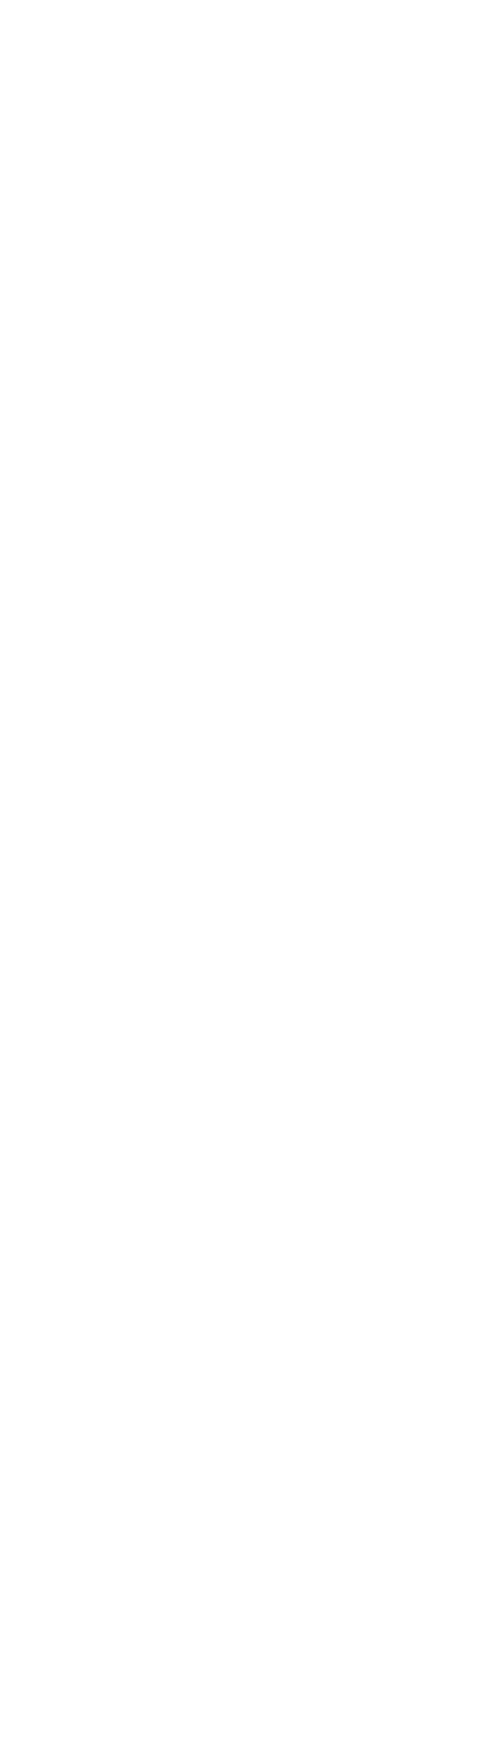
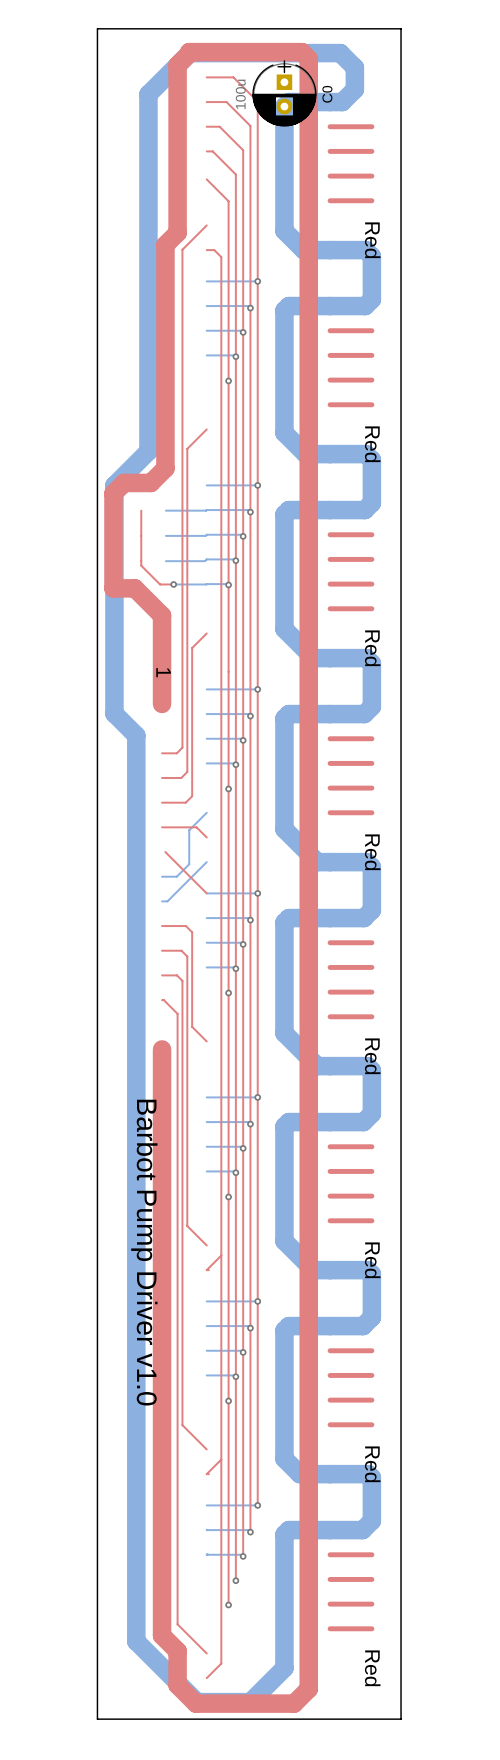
board edge: none -> (97, 28) (401, 28) (401, 1719) (97, 1719) (97, 28)
bottom track: none -> (189, 53) (340, 53) (354, 67) (354, 89) (342, 102) (288, 102) (284, 106) (284, 230) (303, 250) (365, 250) (371, 256) (371, 299) (365, 306) (288, 306) (284, 310) (284, 432) (305, 454) (366, 454) (371, 459) (371, 503) (364, 510) (288, 510) (284, 514) (284, 629) (313, 658) (366, 658) (371, 663) (371, 706) (364, 714) (288, 714) (284, 718) (284, 829) (317, 862) (366, 862) (371, 867) (371, 910) (364, 918) (288, 918) (284, 922) (284, 1033) (317, 1066) (367, 1066) (371, 1070) (371, 1113) (363, 1122) (288, 1122) (284, 1126) (284, 1241) (313, 1270) (367, 1270) (371, 1274) (371, 1317) (363, 1326) (288, 1326) (284, 1330) (284, 1458) (299, 1474) (368, 1474) (371, 1477) (371, 1520) (362, 1530) (288, 1530) (284, 1534) (284, 1668) (250, 1702) (197, 1702) (136, 1641) (136, 735) (114, 713) (114, 485) (148, 451) (148, 94) (189, 53)
top track: none -> (206, 77) (233, 77) (257, 101) (257, 1505)
C0: none -> 100u (284, 93)
top track: none -> (206, 102) (226, 102) (250, 125) (250, 1532)
top track: none -> (206, 126) (219, 126) (243, 150) (243, 1556)
top track: none -> (330, 126) (371, 126)
top track: none -> (206, 151) (212, 151) (235, 174) (235, 1580)
top track: none -> (330, 151) (371, 151)
top track: none -> (330, 176) (371, 176)
top track: none -> (206, 179) (228, 201) (228, 1605)
top track: none -> (330, 200) (371, 200)
top track: none -> (206, 225) (182, 249) (182, 747) (176, 753) (162, 753)
text: none -> Red (372, 240)
top track: none -> (206, 250) (214, 250) (221, 257) (221, 1663) (206, 1678)
bottom track: none -> (206, 281) (257, 281)
via: none -> (257, 281)
bottom track: none -> (206, 306) (248, 306) (250, 308)
via: none -> (250, 308)
bottom track: none -> (206, 330) (241, 330) (243, 332)
top track: none -> (330, 330) (371, 330)
via: none -> (243, 332)
bottom track: none -> (206, 355) (235, 356)
top track: none -> (330, 355) (371, 355)
via: none -> (235, 356)
via: none -> (228, 380)
top track: none -> (330, 380) (371, 380)
top track: none -> (330, 404) (371, 404)
top track: none -> (206, 429) (187, 448) (187, 771) (181, 778) (162, 778)
text: none -> Red (372, 444)
bottom track: none -> (206, 485) (257, 485)
via: none -> (257, 485)
top track: none -> (141, 510) (141, 565) (160, 584) (173, 584)
bottom track: none -> (165, 510) (248, 510) (250, 512)
via: none -> (250, 512)
top track: none -> (330, 534) (371, 534)
bottom track: none -> (165, 535) (241, 534) (243, 536)
via: none -> (243, 536)
top track: none -> (330, 559) (371, 559)
bottom track: none -> (235, 560) (165, 561)
via: none -> (235, 560)
bottom track: none -> (173, 584) (228, 584)
via: none -> (173, 584)
via: none -> (228, 584)
top track: none -> (330, 584) (371, 584)
top track: none -> (330, 608) (371, 608)
top track: none -> (206, 633) (192, 648) (192, 796) (185, 802) (162, 802)
text: none -> Red (372, 648)
text: none -> 1 (163, 672)
bottom track: none -> (206, 689) (257, 689)
via: none -> (257, 689)
top track: none -> (162, 703) (162, 615) (134, 588) (113, 588) (113, 493) (124, 482) (150, 482) (165, 468) (165, 244) (177, 232) (177, 65) (189, 52) (301, 52) (308, 58) (308, 1689) (294, 1703) (196, 1703) (177, 1685) (177, 1651) (162, 1635) (162, 1049)
bottom track: none -> (206, 714) (248, 714) (250, 716)
via: none -> (250, 716)
bottom track: none -> (206, 738) (241, 738) (243, 740)
top track: none -> (330, 738) (371, 738)
via: none -> (243, 740)
bottom track: none -> (206, 763) (235, 764)
top track: none -> (330, 763) (371, 763)
via: none -> (235, 764)
via: none -> (228, 788)
top track: none -> (330, 788) (371, 788)
bottom track: none -> (206, 812) (189, 830) (189, 864) (176, 876) (162, 876)
top track: none -> (330, 812) (371, 812)
top track: none -> (162, 827) (196, 827) (206, 837)
top track: none -> (165, 852) (206, 893)
text: none -> Red (372, 852)
bottom track: none -> (206, 862) (167, 901) (162, 901)
bottom track: none -> (206, 893) (257, 893)
via: none -> (257, 893)
bottom track: none -> (206, 918) (248, 918) (250, 920)
via: none -> (250, 920)
top track: none -> (162, 926) (185, 926) (192, 932) (192, 1026) (206, 1041)
bottom track: none -> (206, 942) (241, 942) (243, 944)
top track: none -> (330, 942) (371, 942)
via: none -> (243, 944)
top track: none -> (162, 950) (181, 950) (187, 956) (187, 1226) (206, 1245)
bottom track: none -> (206, 967) (235, 968)
top track: none -> (330, 967) (371, 967)
via: none -> (235, 968)
top track: none -> (162, 975) (177, 975) (182, 980) (182, 1425) (206, 1449)
via: none -> (228, 992)
top track: none -> (330, 992) (371, 992)
top track: none -> (162, 1000) (177, 1013) (177, 1624) (206, 1653)
top track: none -> (330, 1016) (371, 1016)
text: none -> Red (372, 1056)
bottom track: none -> (206, 1097) (257, 1097)
via: none -> (257, 1097)
bottom track: none -> (206, 1122) (248, 1122) (250, 1124)
via: none -> (250, 1124)
bottom track: none -> (206, 1146) (241, 1146) (243, 1148)
top track: none -> (330, 1146) (371, 1146)
via: none -> (243, 1148)
bottom track: none -> (206, 1171) (235, 1172)
top track: none -> (330, 1171) (371, 1171)
via: none -> (235, 1172)
via: none -> (228, 1196)
top track: none -> (330, 1196) (371, 1196)
top track: none -> (330, 1220) (371, 1220)
text: none -> Barbot Pump Driver v1.0 (144, 1252)
top track: none -> (221, 1255) (206, 1270) (208, 1270)
text: none -> Red (372, 1260)
bottom track: none -> (206, 1301) (257, 1301)
via: none -> (257, 1301)
bottom track: none -> (206, 1326) (248, 1326) (250, 1328)
via: none -> (250, 1328)
bottom track: none -> (206, 1350) (241, 1350) (243, 1352)
top track: none -> (330, 1350) (371, 1350)
via: none -> (243, 1352)
bottom track: none -> (206, 1375) (235, 1376)
top track: none -> (330, 1375) (371, 1375)
via: none -> (235, 1376)
via: none -> (228, 1400)
top track: none -> (330, 1400) (371, 1400)
top track: none -> (330, 1424) (371, 1424)
top track: none -> (221, 1459) (206, 1474) (208, 1474)
text: none -> Red (372, 1464)
bottom track: none -> (206, 1505) (257, 1505)
via: none -> (257, 1505)
bottom track: none -> (207, 1529) (248, 1530) (250, 1532)
via: none -> (250, 1532)
bottom track: none -> (207, 1554) (241, 1554) (243, 1556)
top track: none -> (330, 1554) (371, 1554)
via: none -> (243, 1556)
top track: none -> (330, 1579) (371, 1579)
via: none -> (235, 1580)
top track: none -> (330, 1604) (371, 1604)
via: none -> (228, 1605)
top track: none -> (330, 1628) (371, 1628)
text: none -> Red (372, 1668)

